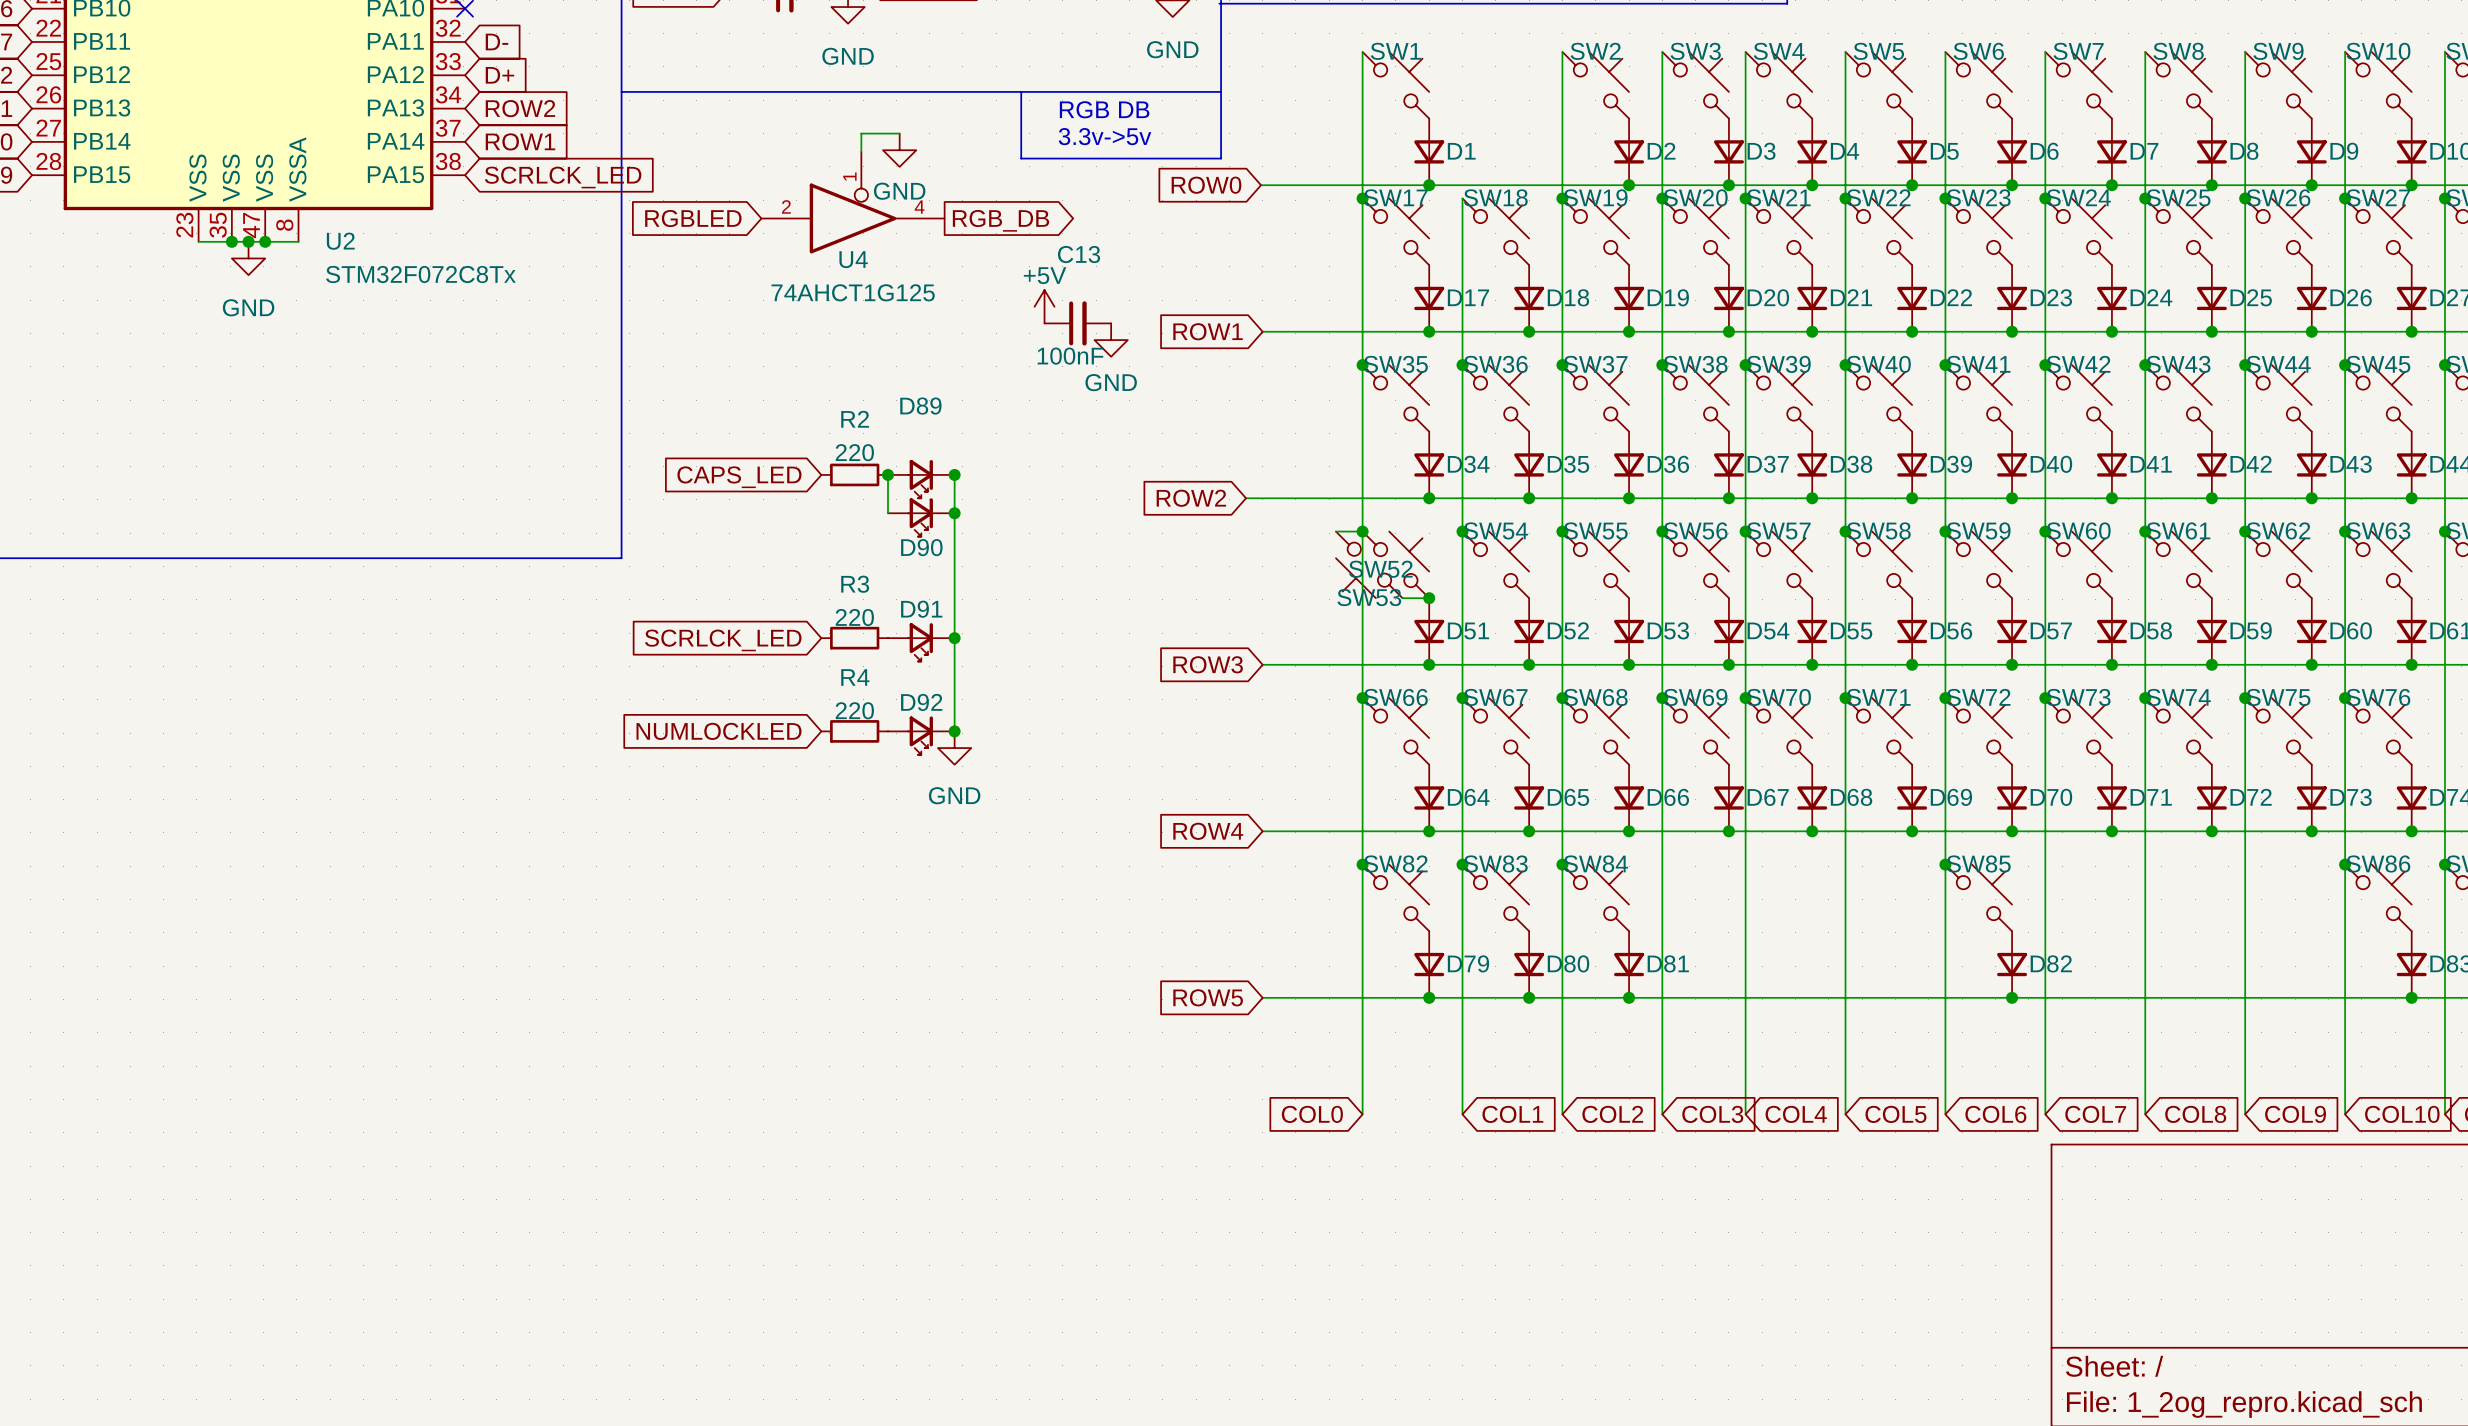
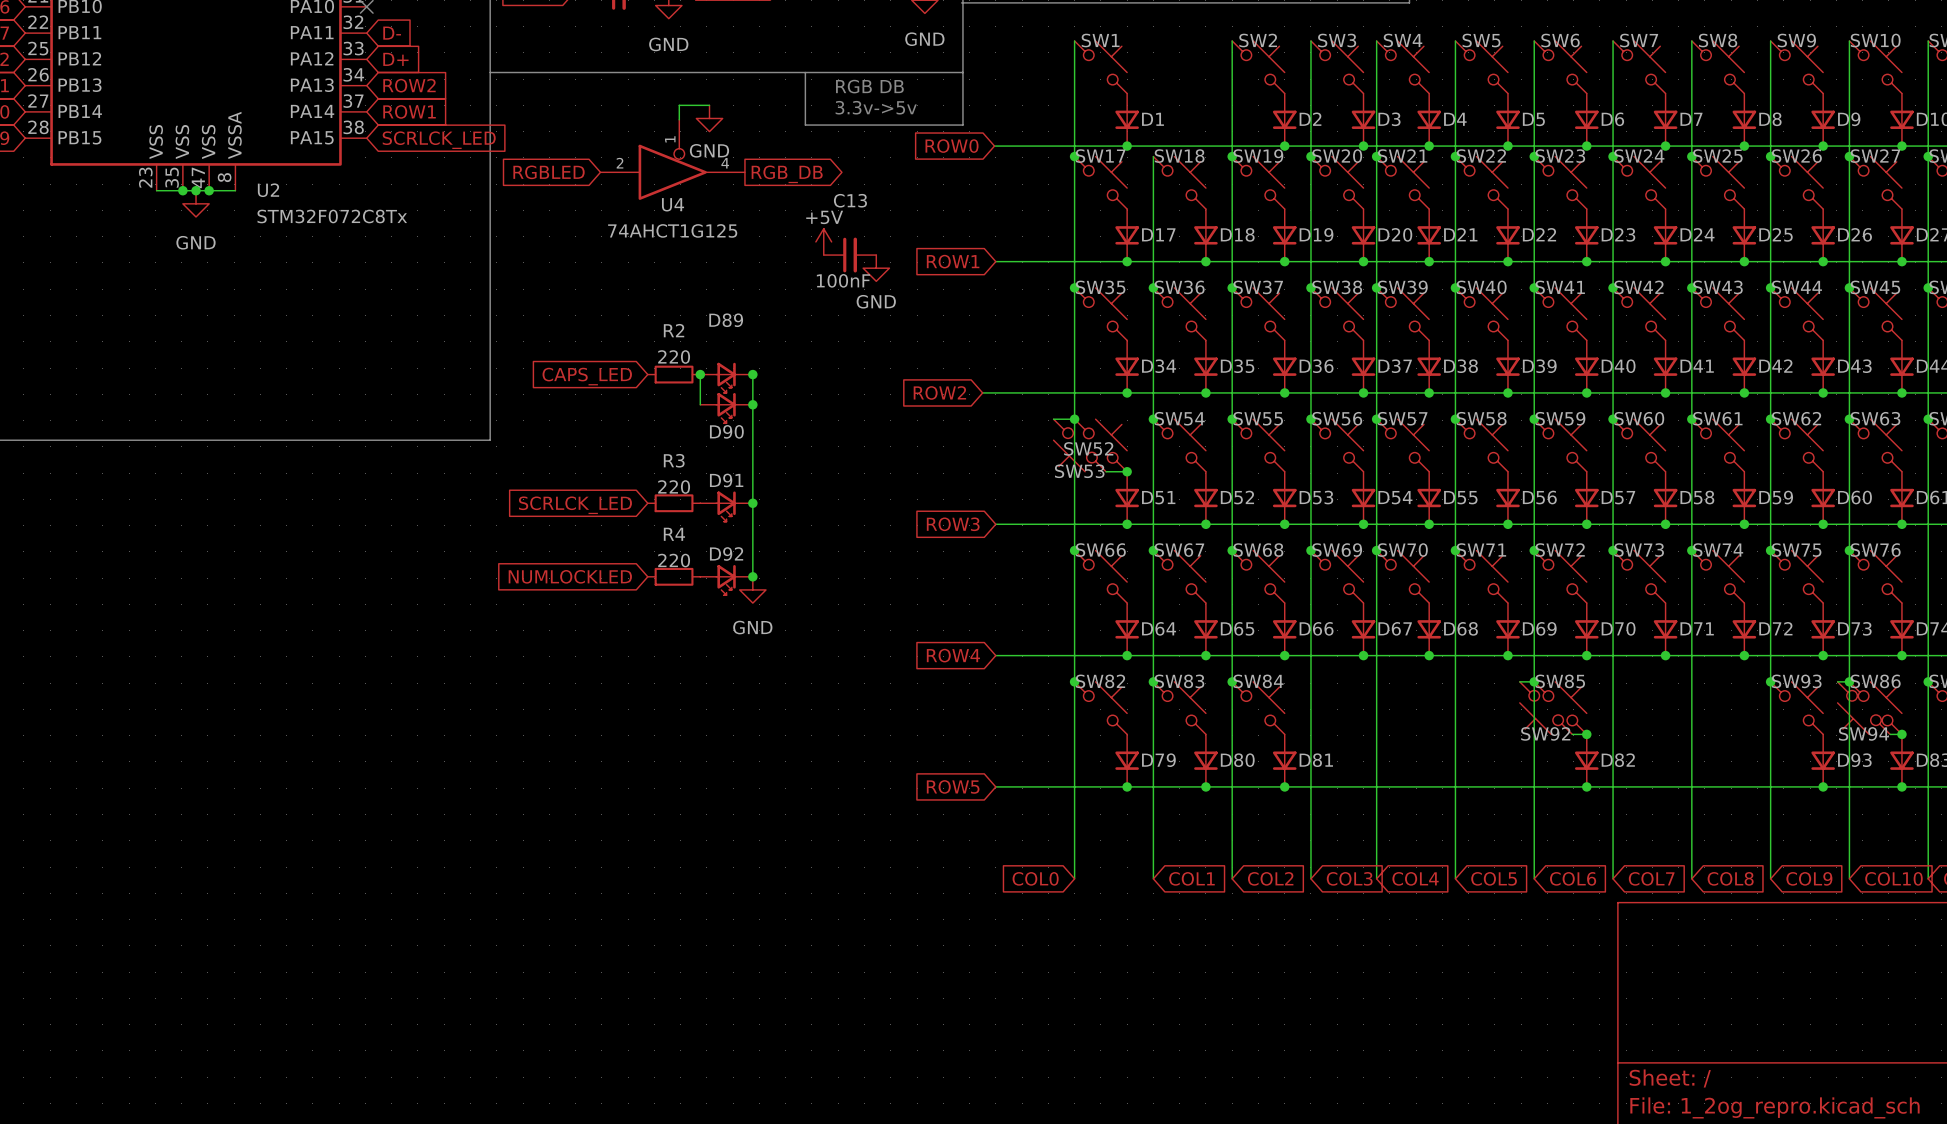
wire: none -> (1519, 681) (1534, 681)
junction: none -> (1770, 681)
wire: none -> (1837, 681) (1849, 681)
SW92: none -> (1546, 708)
SW93: none -> (1796, 708)
SW94: none -> (1863, 708)
wire: none -> (1572, 734) (1586, 734)
junction: none -> (1586, 734)
wire: none -> (1890, 734) (1901, 734)
junction: none -> (1901, 734)
D93: none -> (1823, 760)
junction: none -> (1823, 786)

